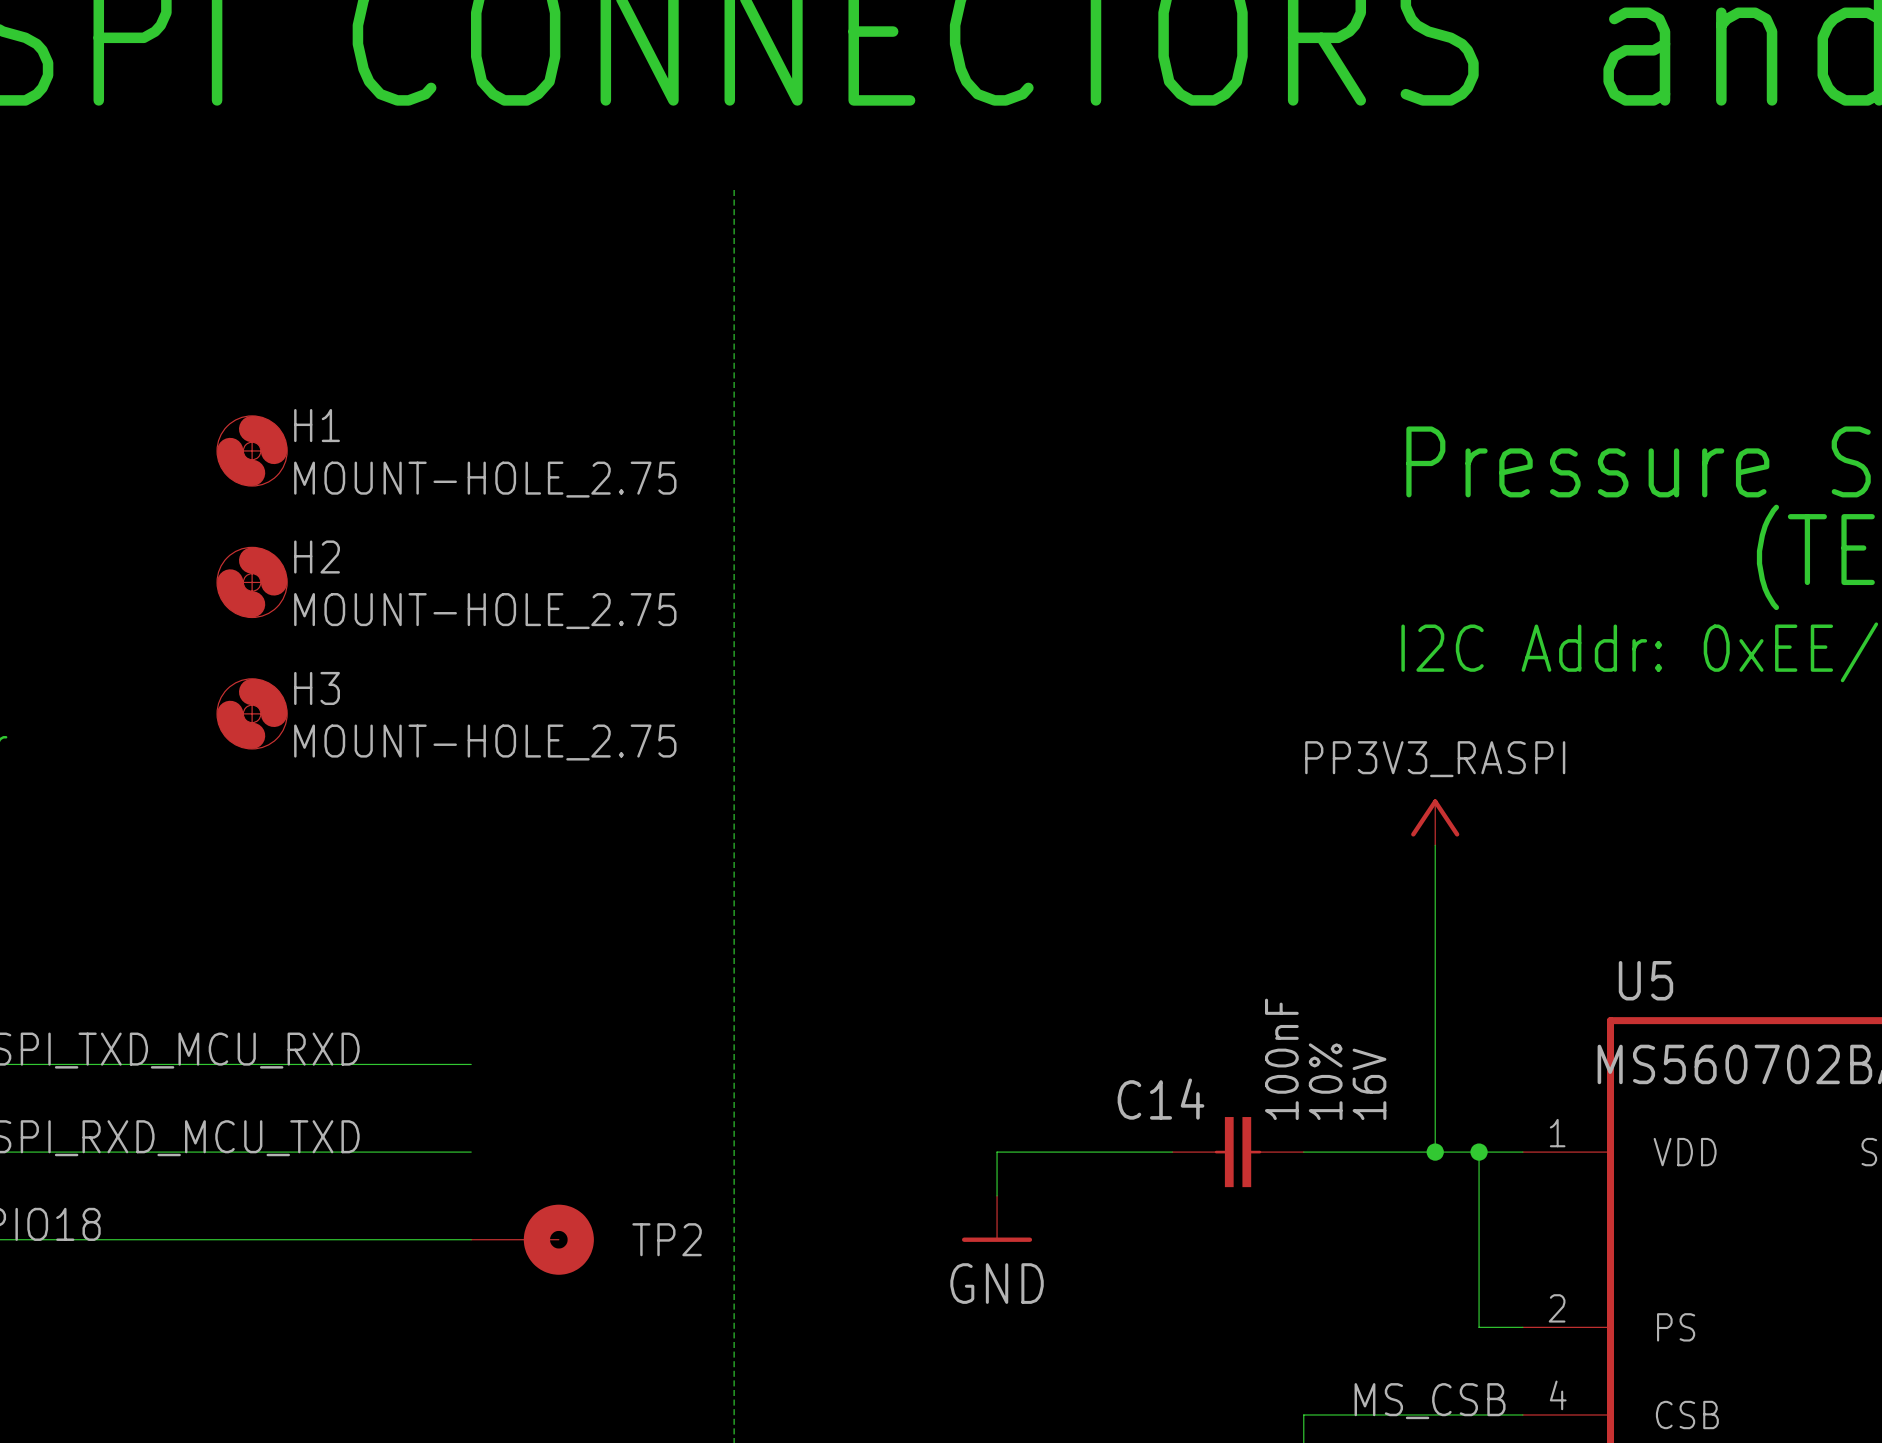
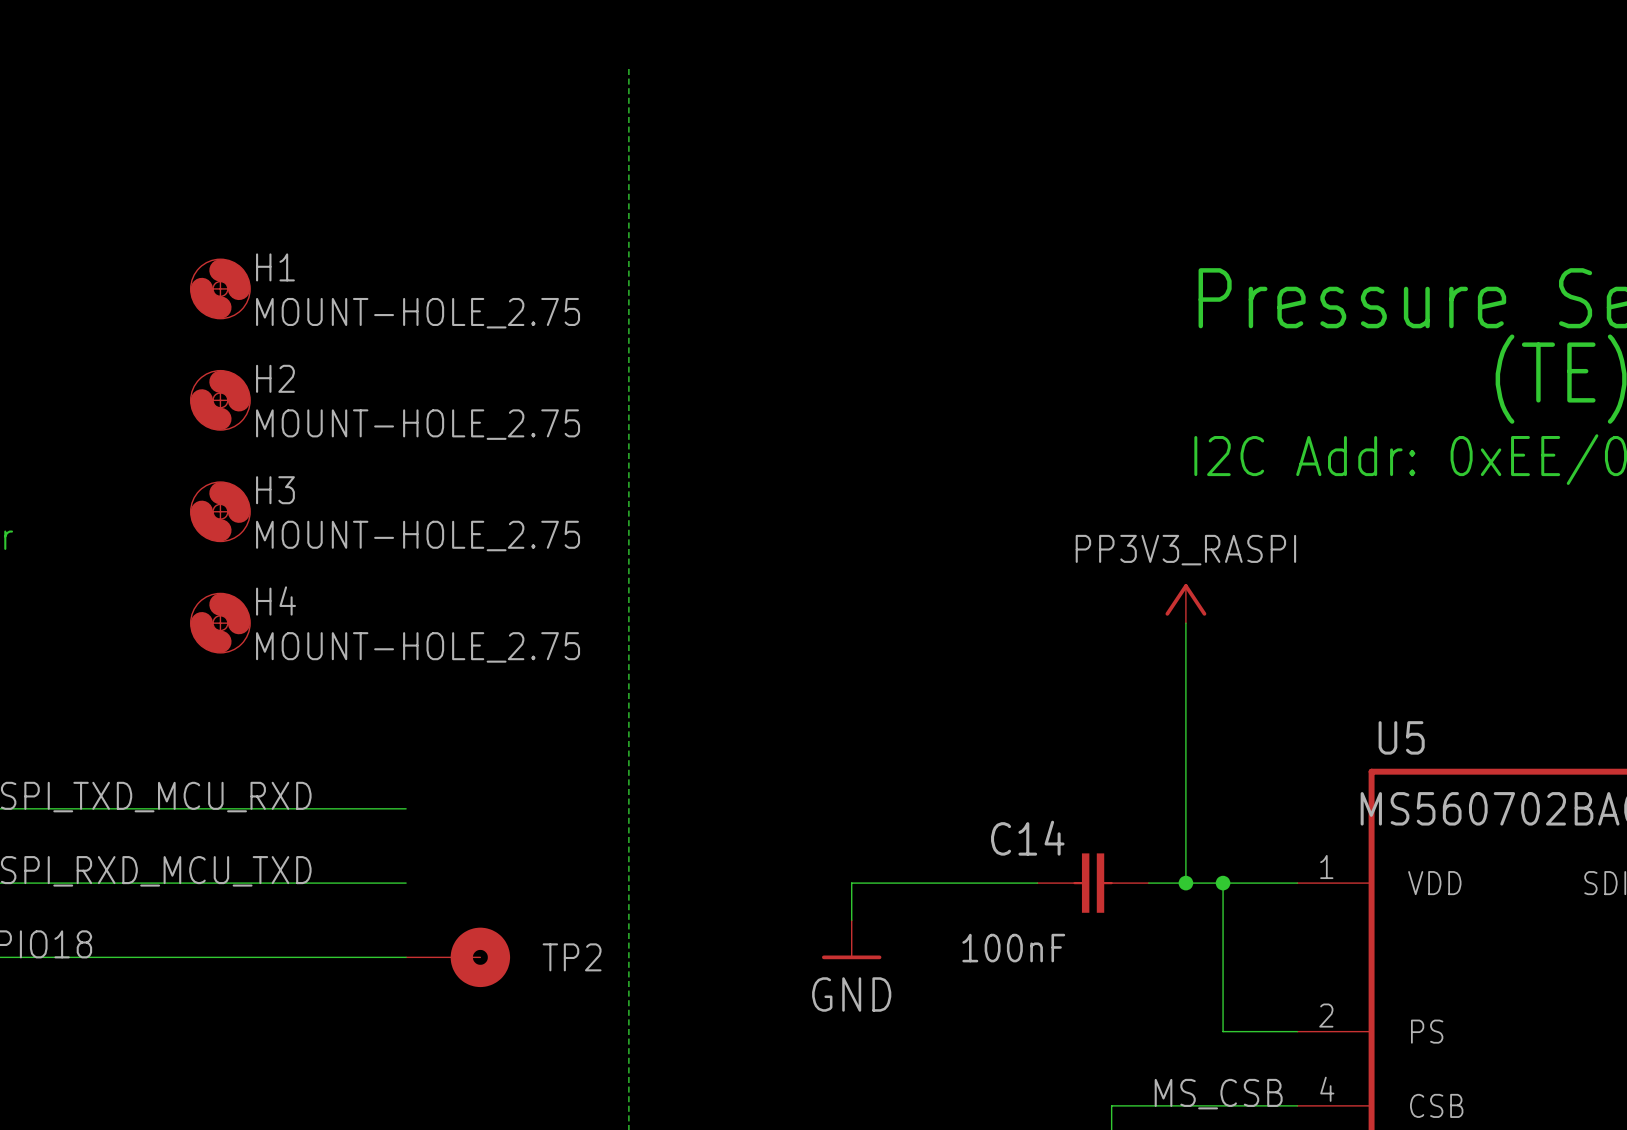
power symbol position: PP3V3_RASPI (1435, 822) -> PP3V3_RASPI (1185, 603)
H4: none -> MOUNT-HOLE_2.75 (220, 623)
wire: (1435, 845) (1435, 1152) -> (1185, 623) (1185, 883)
C14 value rotation: 0° (1281, 1059) -> 90° clockwise (1013, 948)
C14 value position: 100nF (1281, 1059) -> 100nF (1013, 948)
C14 text: 10% (1325, 1081) -> none
C14 text: 16V (1369, 1084) -> none
C14 position: (1238, 1152) -> (1093, 883)
wire: (1479, 1152) (1479, 1327) -> (1223, 883) (1223, 1031) (1260, 1031)
junction position: (1479, 1152) -> (1185, 883)

